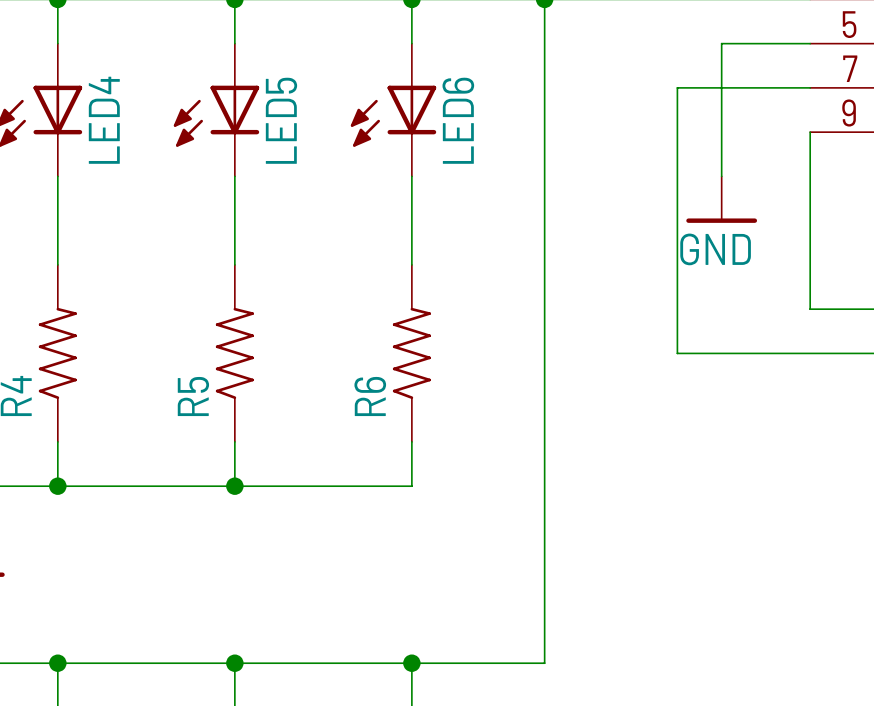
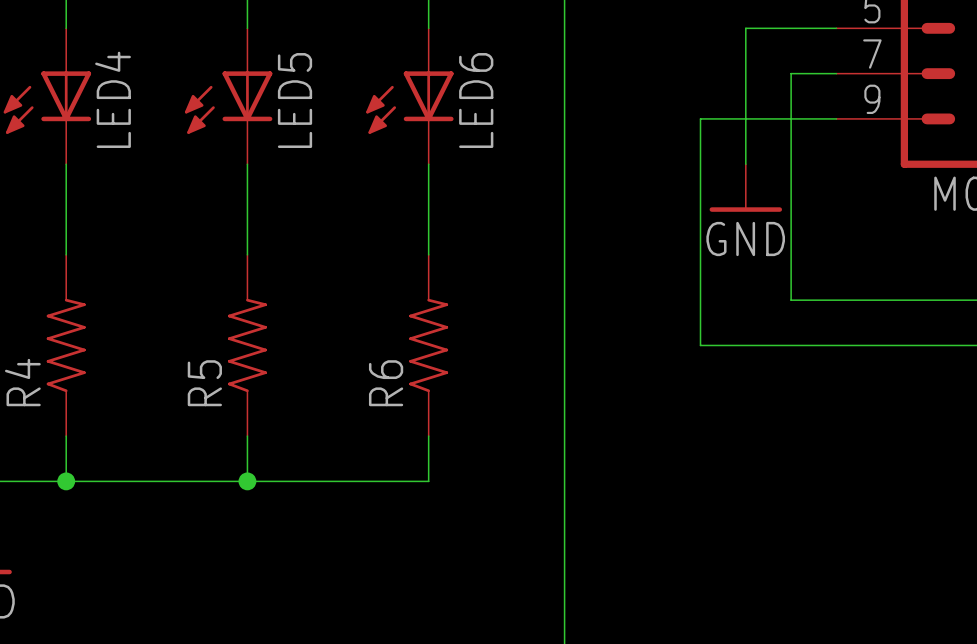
wire: (765, 87) (677, 87) (677, 132) -> (836, 118) (700, 118)
wire: (810, 132) (810, 309) -> (791, 73) (791, 300) (836, 300)

